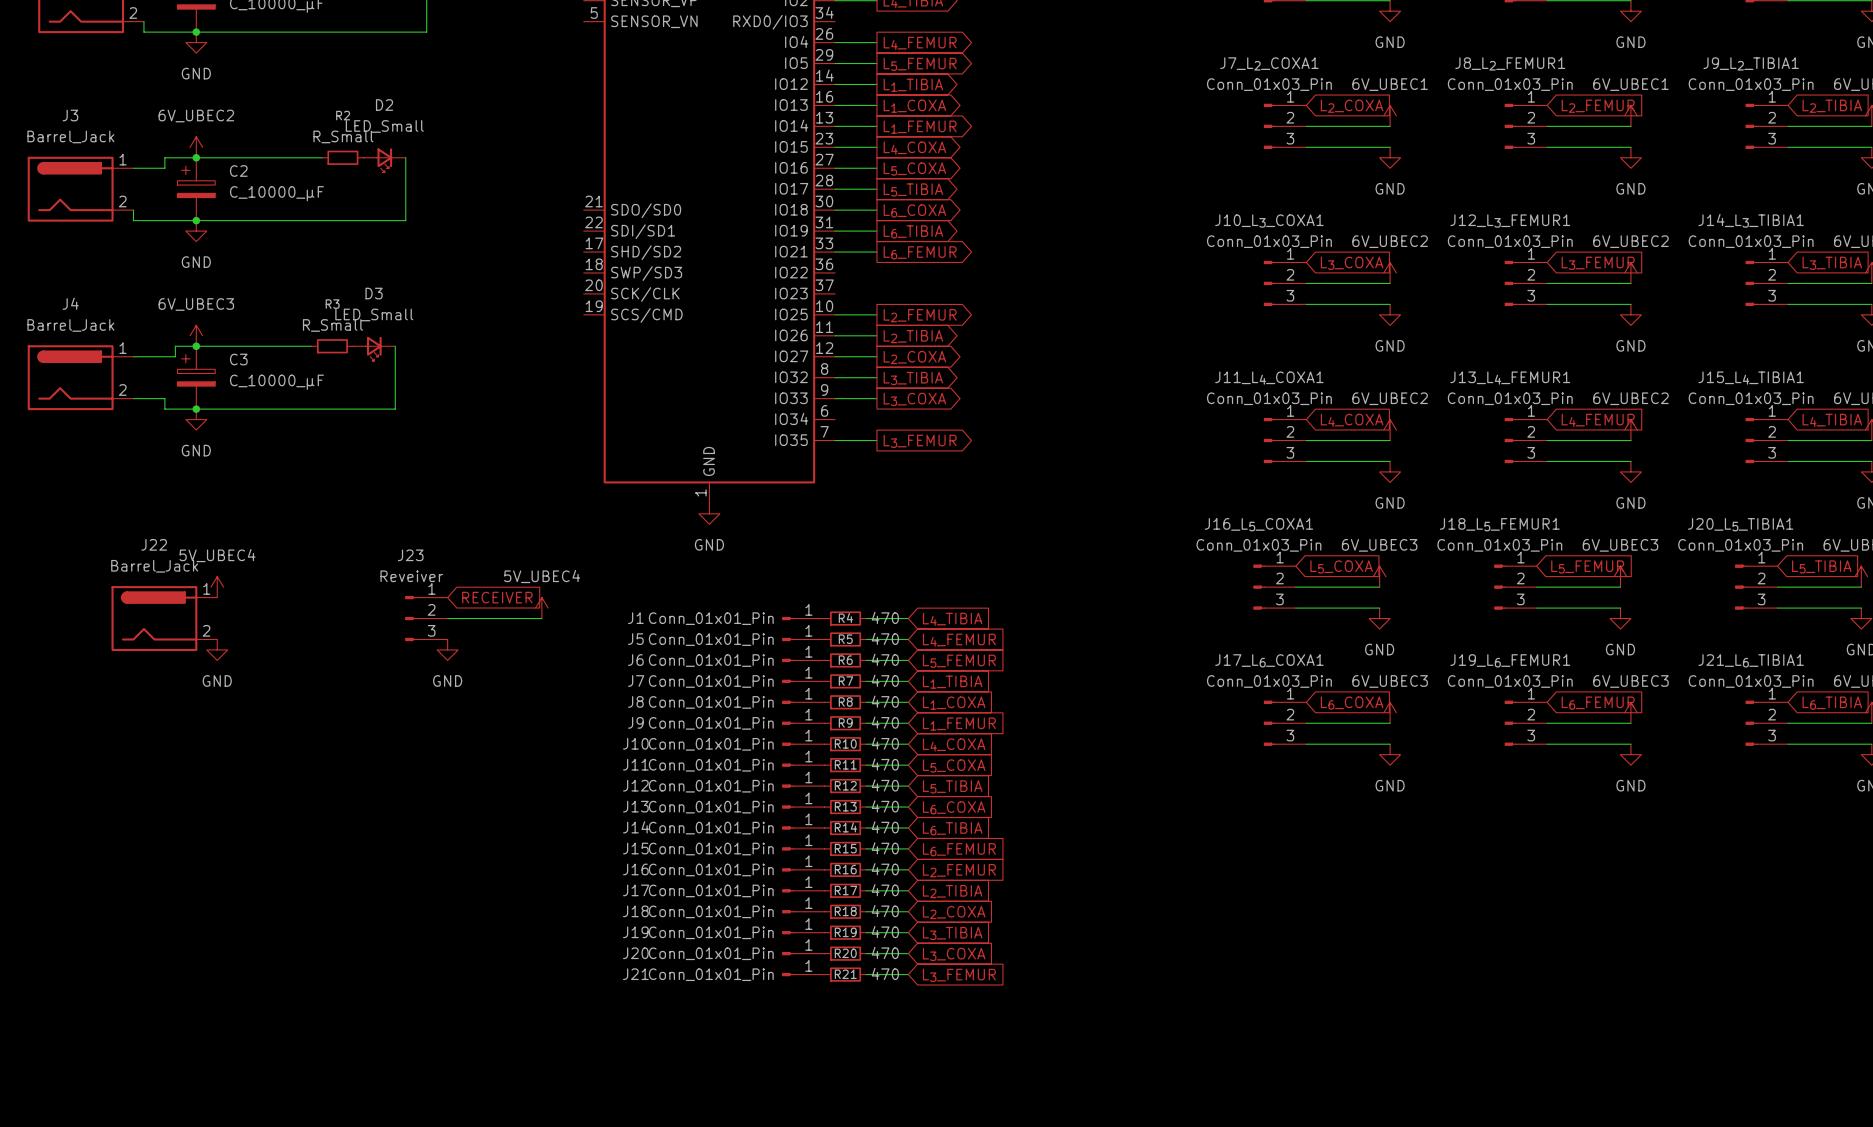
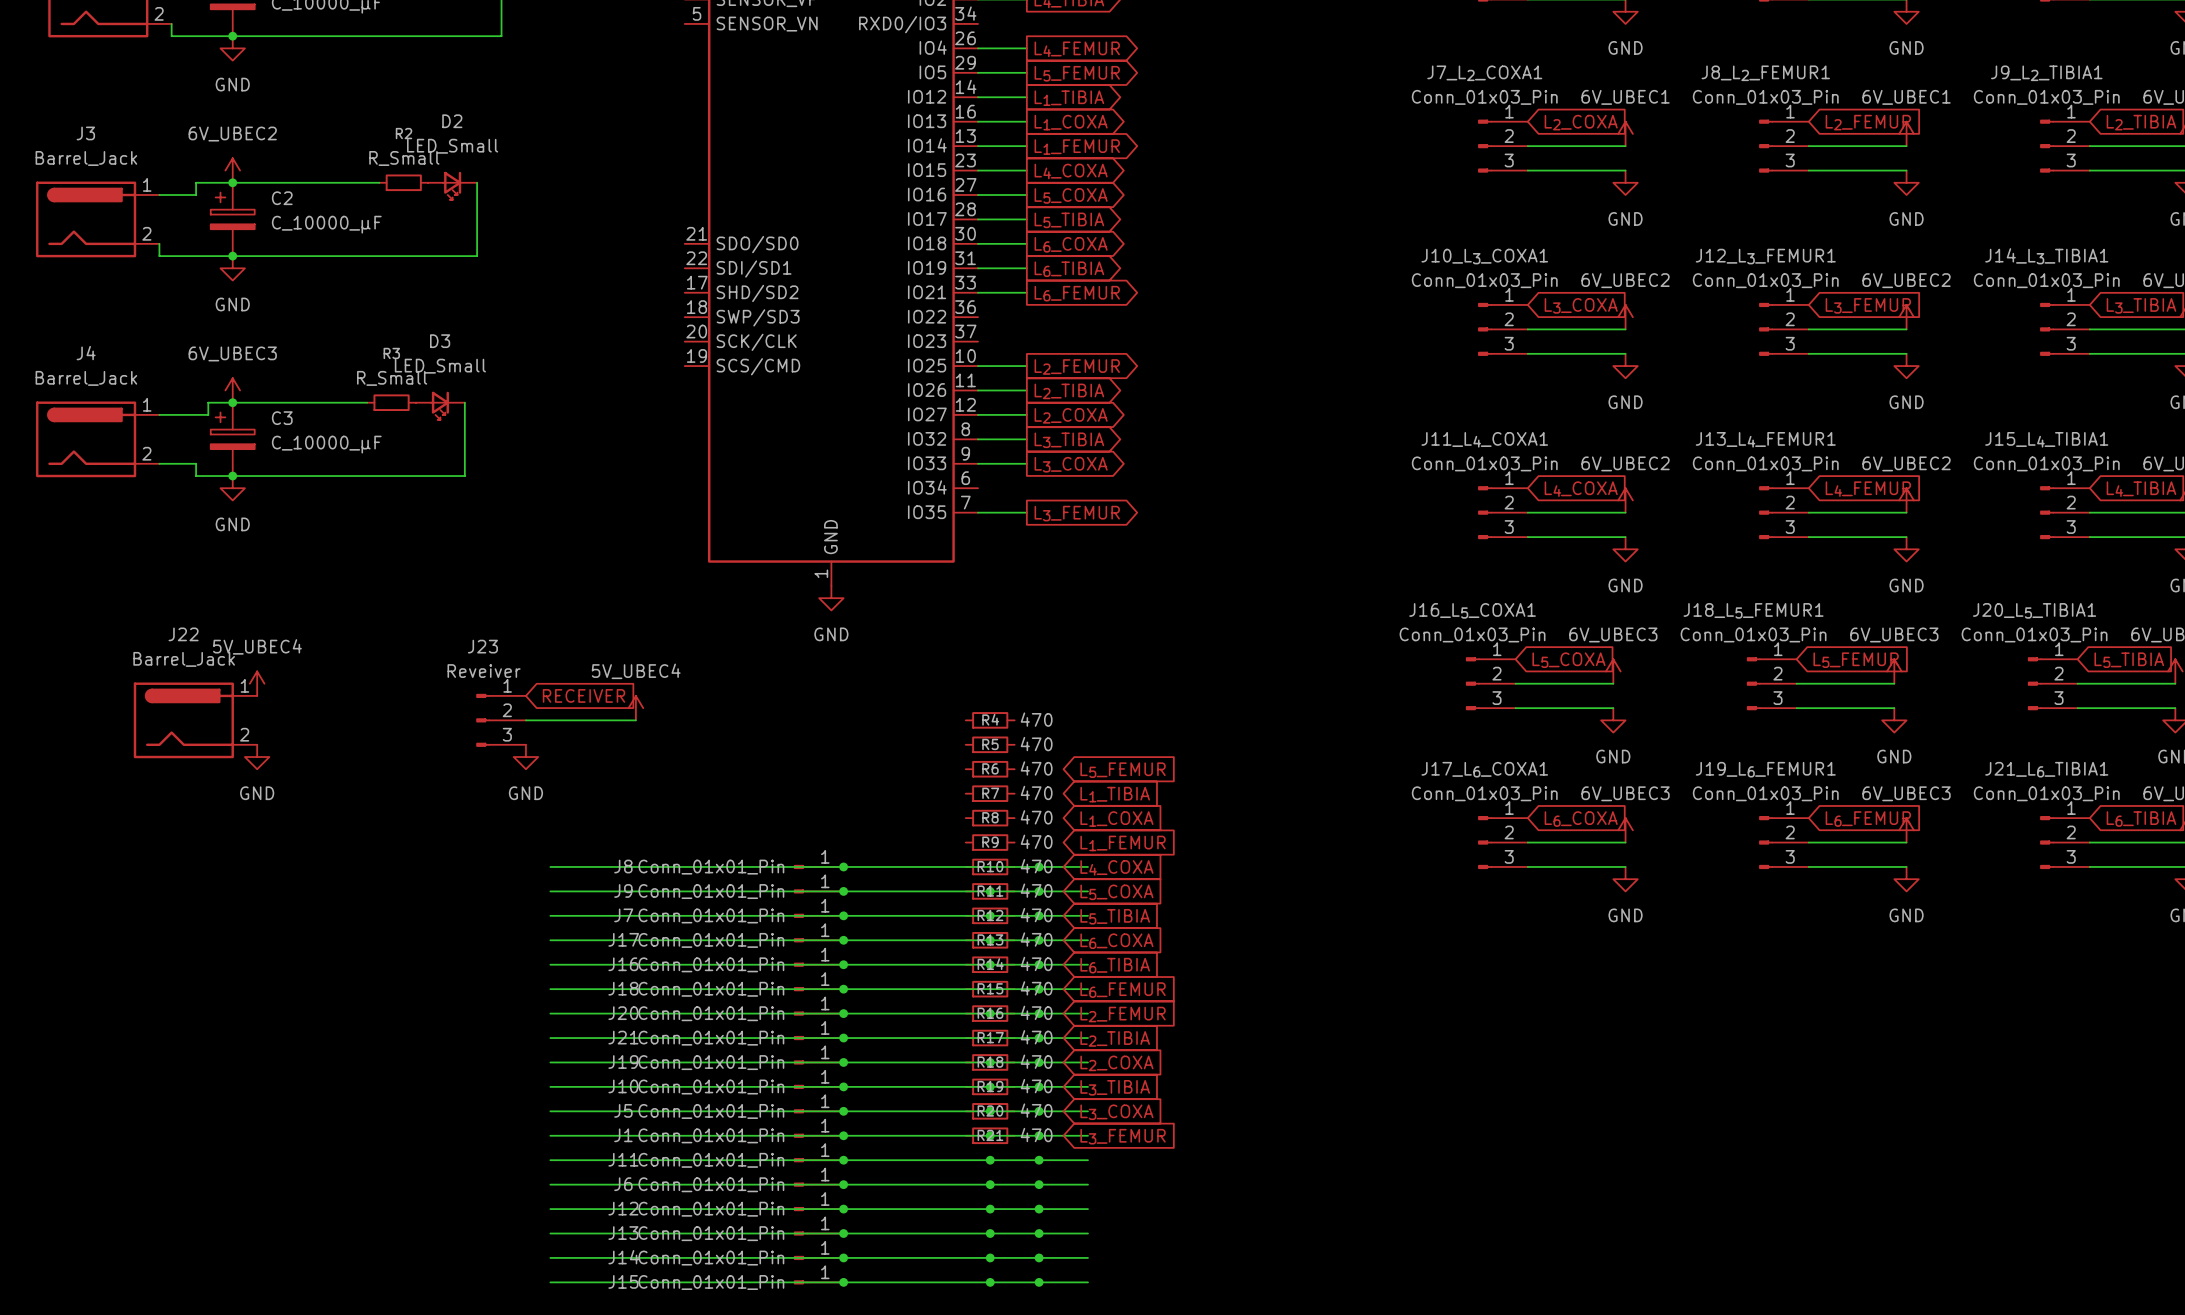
J1 position: (803, 618) -> (818, 1135)
wire: (866, 618) (908, 618) -> none
global label: L4_TIBIA (952, 619) -> none
J5 position: (803, 639) -> (818, 1111)
wire: (866, 639) (908, 639) -> none
global label: L4_FEMUR (959, 640) -> none
J6 position: (803, 660) -> (818, 1184)
wire: (866, 660) (908, 660) -> none
J7 position: (803, 681) -> (818, 915)
wire: (866, 681) (908, 681) -> none
J8 position: (803, 702) -> (818, 866)
wire: (866, 702) (908, 702) -> none
J9 position: (803, 723) -> (818, 891)
wire: (866, 723) (908, 723) -> none
wire: none -> (550, 866) (1014, 866)
junction: none -> (843, 866)
J10 position: (803, 744) -> (818, 1086)
junction: none -> (1039, 866)
wire: none -> (1063, 866) (1087, 866)
wire: none -> (550, 891) (1014, 891)
junction: none -> (843, 891)
J11 position: (803, 765) -> (818, 1160)
junction: none -> (990, 891)
junction: none -> (1039, 891)
wire: none -> (1063, 891) (1087, 891)
wire: none -> (550, 915) (1014, 915)
junction: none -> (843, 915)
J12 position: (803, 786) -> (818, 1209)
junction: none -> (990, 915)
junction: none -> (1039, 915)
wire: none -> (1063, 915) (1087, 915)
wire: none -> (550, 940) (1014, 940)
junction: none -> (843, 940)
J13 position: (803, 807) -> (818, 1233)
junction: none -> (990, 940)
junction: none -> (1039, 940)
wire: none -> (1063, 940) (1087, 940)
wire: none -> (550, 964) (1014, 964)
junction: none -> (843, 964)
J14 position: (803, 827) -> (818, 1257)
junction: none -> (990, 964)
junction: none -> (1039, 964)
wire: none -> (1063, 964) (1087, 964)
wire: none -> (550, 989) (1014, 989)
junction: none -> (843, 989)
J15 position: (803, 848) -> (818, 1282)
junction: none -> (1039, 989)
wire: none -> (1063, 989) (1087, 989)
wire: none -> (550, 1013) (1014, 1013)
junction: none -> (843, 1013)
J16 position: (803, 869) -> (818, 964)
junction: none -> (990, 1013)
junction: none -> (1039, 1013)
wire: none -> (1063, 1013) (1087, 1013)
wire: none -> (550, 1038) (1014, 1038)
junction: none -> (843, 1038)
J17 position: (803, 890) -> (818, 940)
junction: none -> (1039, 1038)
wire: none -> (1063, 1038) (1087, 1038)
wire: none -> (550, 1062) (1014, 1062)
junction: none -> (843, 1062)
J18 position: (803, 911) -> (818, 989)
junction: none -> (990, 1062)
junction: none -> (1039, 1062)
wire: none -> (1063, 1062) (1087, 1062)
wire: none -> (550, 1086) (1014, 1086)
junction: none -> (843, 1086)
J19 position: (803, 932) -> (818, 1062)
junction: none -> (990, 1086)
junction: none -> (1039, 1086)
wire: none -> (1063, 1086) (1087, 1086)
wire: none -> (550, 1111) (1014, 1111)
junction: none -> (843, 1111)
J20 position: (803, 953) -> (818, 1013)
junction: none -> (990, 1111)
junction: none -> (1039, 1111)
wire: none -> (1063, 1111) (1087, 1111)
wire: none -> (550, 1135) (1014, 1135)
junction: none -> (843, 1135)
J21 position: (803, 974) -> (818, 1038)
junction: none -> (990, 1135)
junction: none -> (1039, 1135)
wire: none -> (1063, 1135) (1087, 1135)
wire: none -> (550, 1160) (1087, 1160)
junction: none -> (843, 1160)
junction: none -> (990, 1160)
junction: none -> (1039, 1160)
wire: none -> (550, 1184) (1087, 1184)
junction: none -> (843, 1184)
junction: none -> (990, 1184)
junction: none -> (1039, 1184)
wire: none -> (550, 1209) (1087, 1209)
junction: none -> (843, 1209)
junction: none -> (990, 1209)
junction: none -> (1039, 1209)
wire: none -> (550, 1233) (1087, 1233)
junction: none -> (843, 1233)
junction: none -> (990, 1233)
junction: none -> (1039, 1233)
wire: none -> (550, 1257) (1087, 1257)
junction: none -> (843, 1257)
junction: none -> (990, 1257)
junction: none -> (1039, 1257)
wire: none -> (550, 1282) (1087, 1282)
junction: none -> (843, 1282)
junction: none -> (990, 1282)
junction: none -> (1039, 1282)

